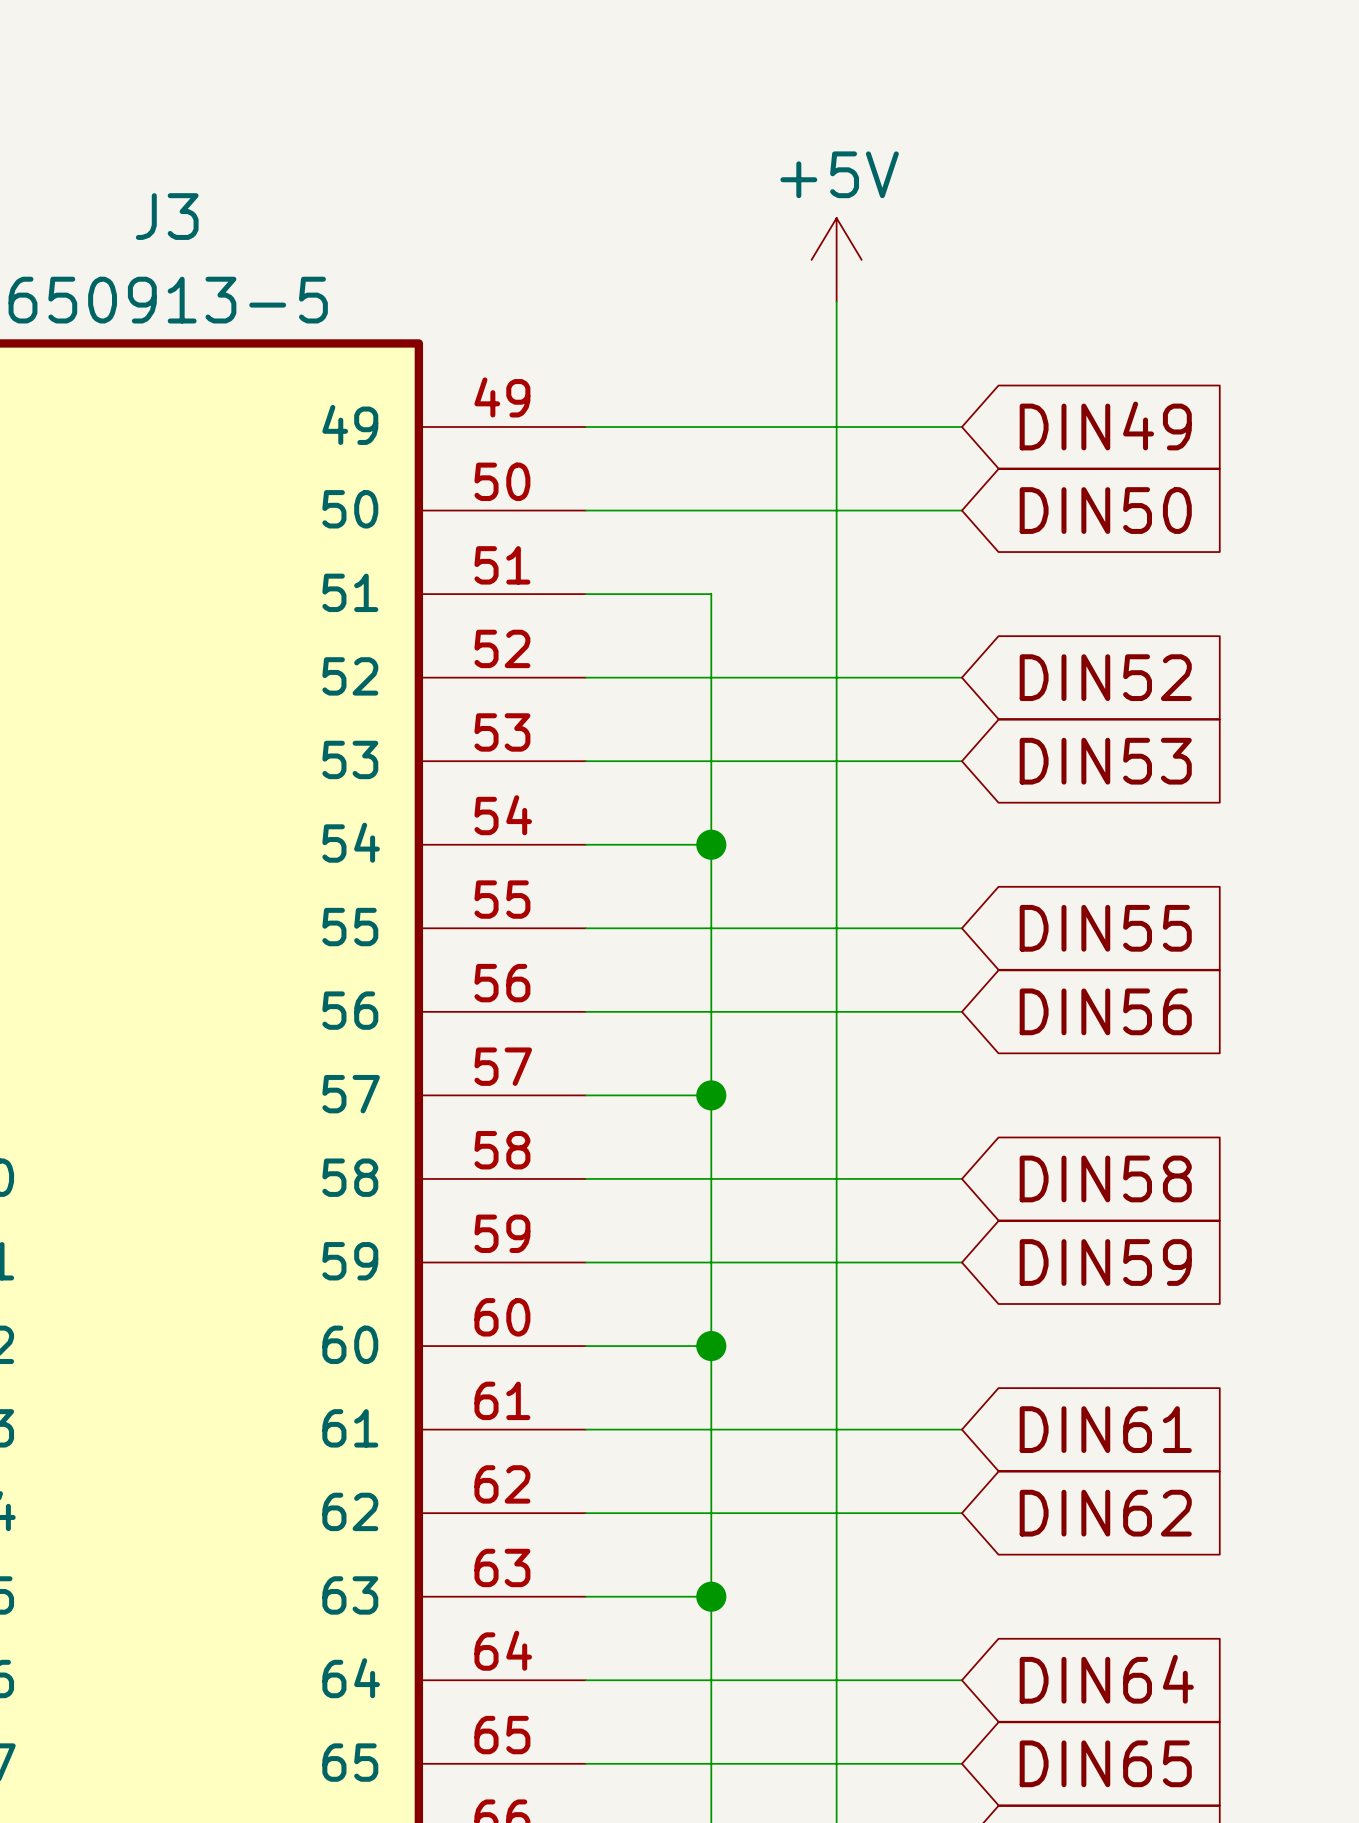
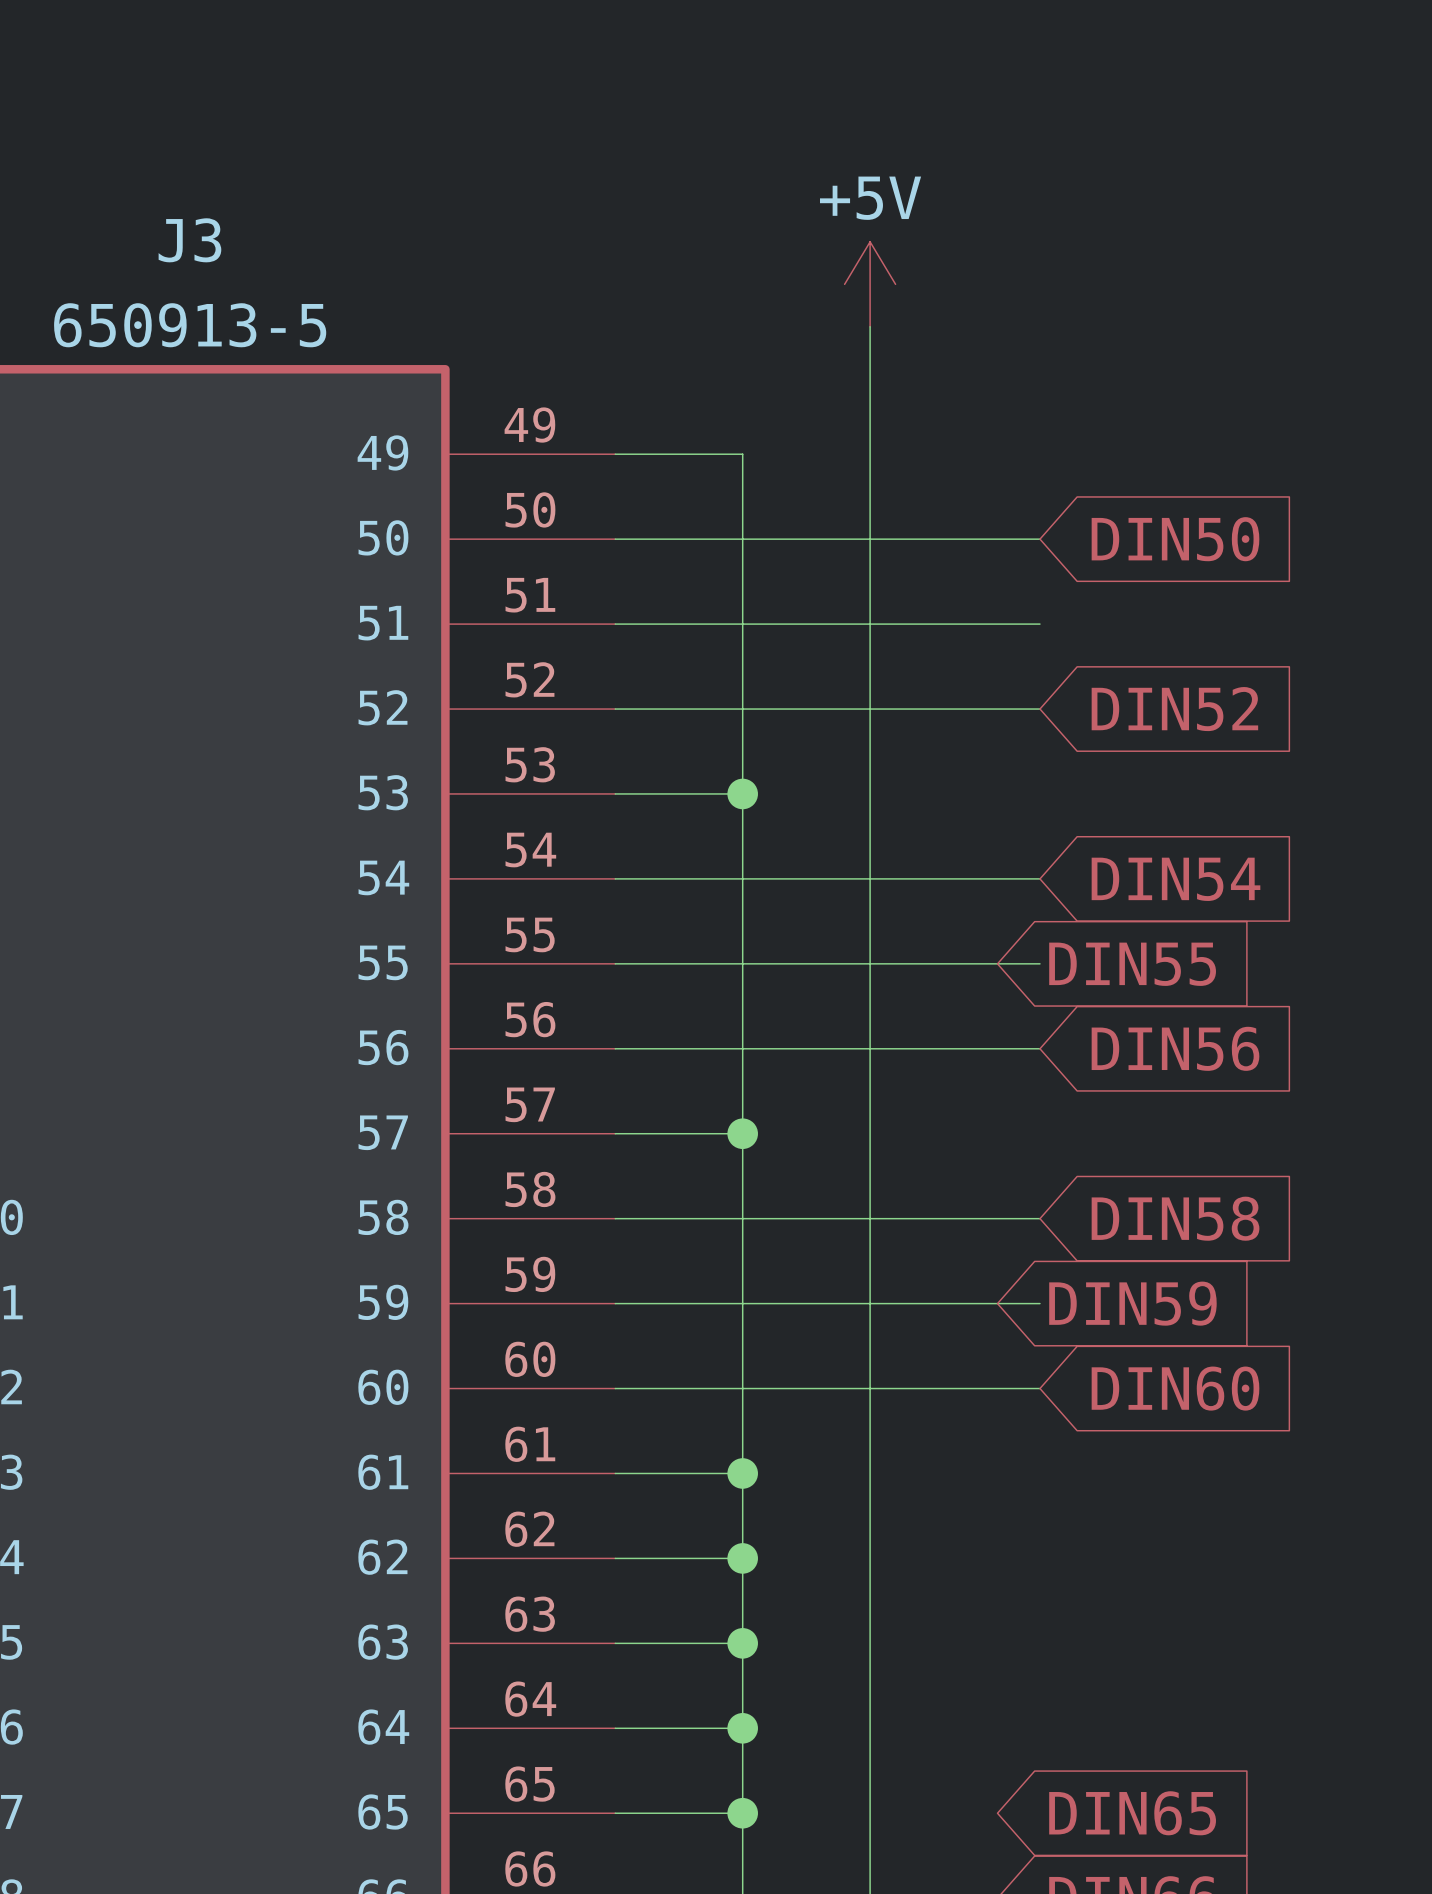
wire: (711, 426) (961, 426) -> (742, 454) (742, 624) (1039, 624)
global label: DIN49 (1105, 426) -> none
wire: none -> (997, 539) (1039, 539)
global label position: DIN50 (1105, 510) -> DIN50 (1175, 539)
wire: none -> (997, 709) (1039, 709)
global label position: DIN52 (1105, 677) -> DIN52 (1174, 709)
wire: (711, 761) (961, 761) -> none
global label: DIN53 (1105, 761) -> DIN54 (1175, 879)
wire: none -> (742, 878) (1039, 878)
junction position: (711, 844) -> (742, 793)
wire: none -> (997, 963) (1039, 963)
wire: none -> (997, 1048) (1039, 1048)
global label position: DIN56 (1105, 1011) -> DIN56 (1175, 1048)
wire: none -> (997, 1218) (1039, 1218)
global label position: DIN58 (1105, 1178) -> DIN58 (1175, 1218)
wire: none -> (997, 1303) (1039, 1303)
wire: none -> (742, 1388) (1039, 1388)
junction: (711, 1346) -> none
wire: (711, 1429) (961, 1429) -> none
junction: none -> (742, 1473)
global label: DIN61 (1105, 1429) -> DIN60 (1175, 1388)
wire: (711, 1513) (961, 1513) -> none
junction: none -> (742, 1558)
global label: DIN62 (1105, 1513) -> none
global label: DIN64 (1106, 1679) -> none
wire: (711, 1680) (961, 1680) -> none
junction: none -> (742, 1728)
wire: (711, 1763) (961, 1763) -> none
junction: none -> (742, 1813)

